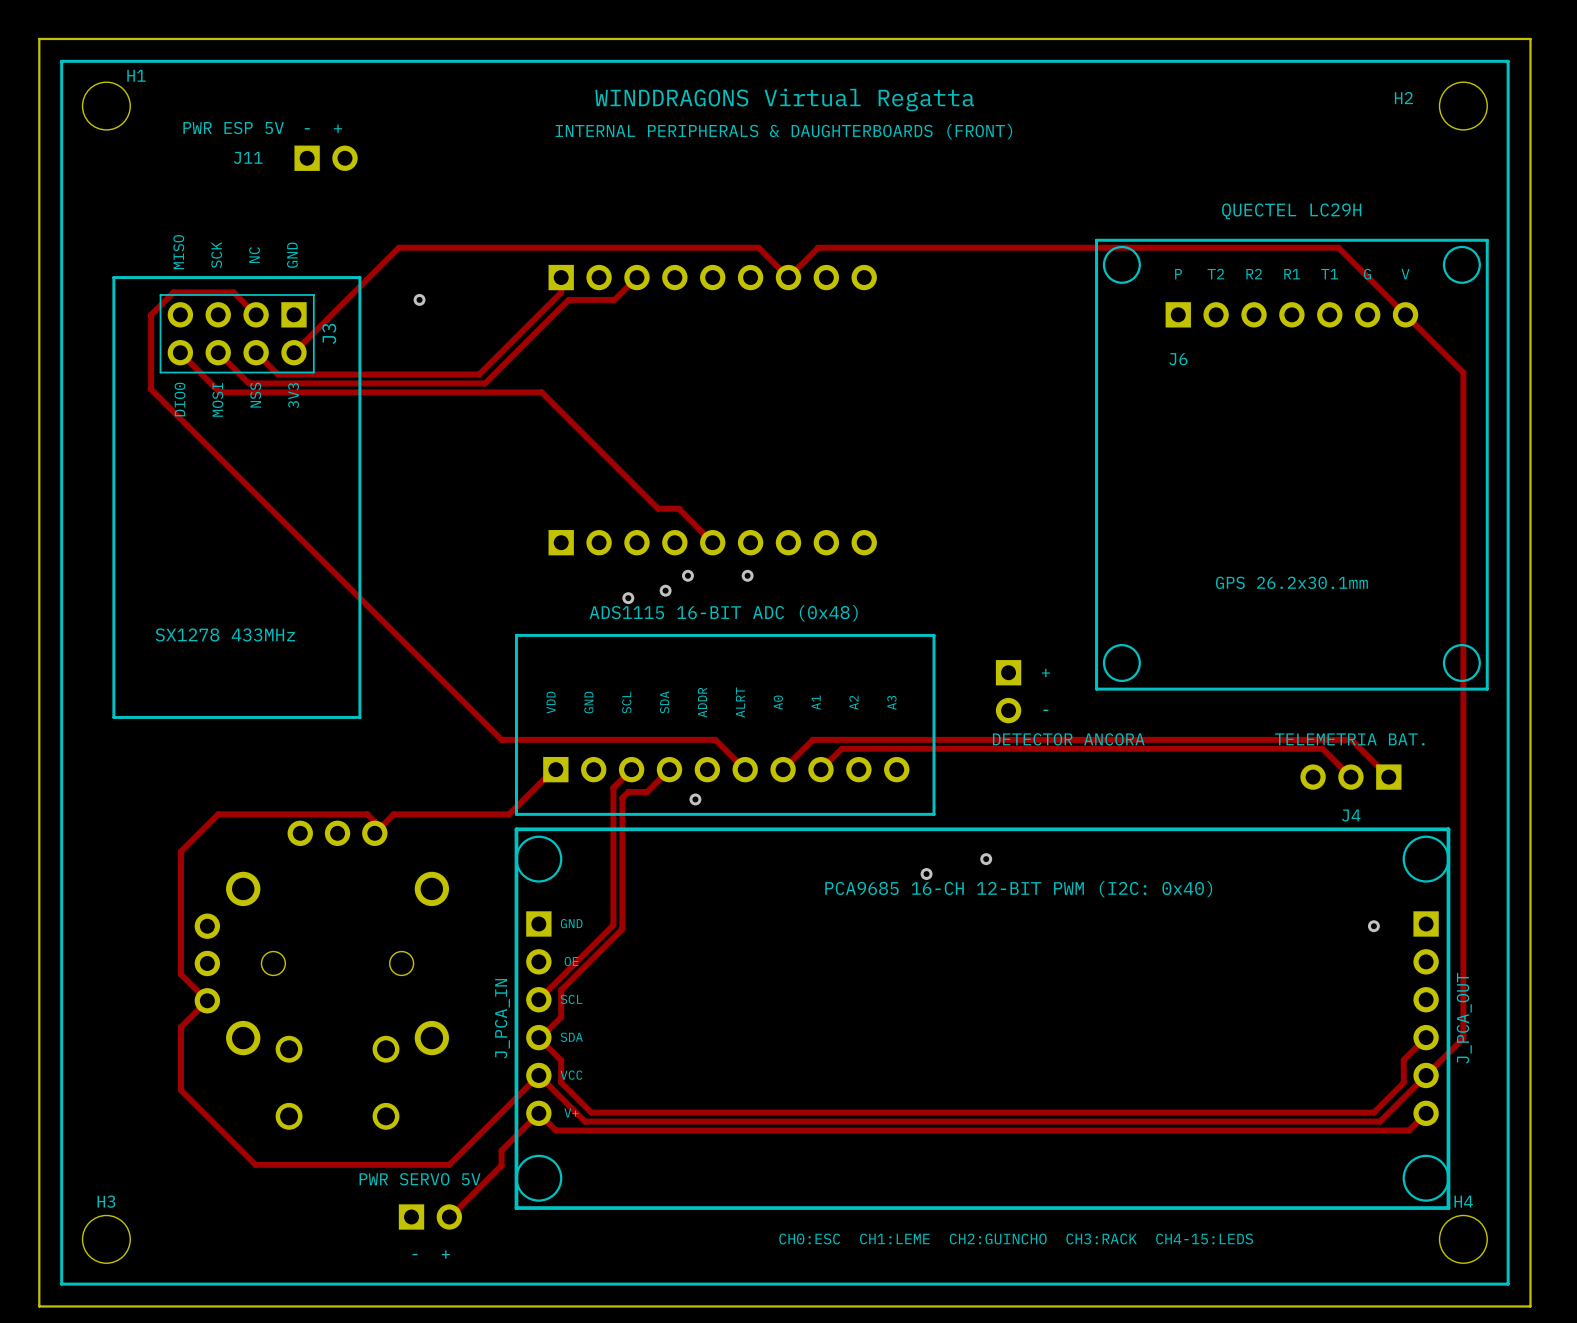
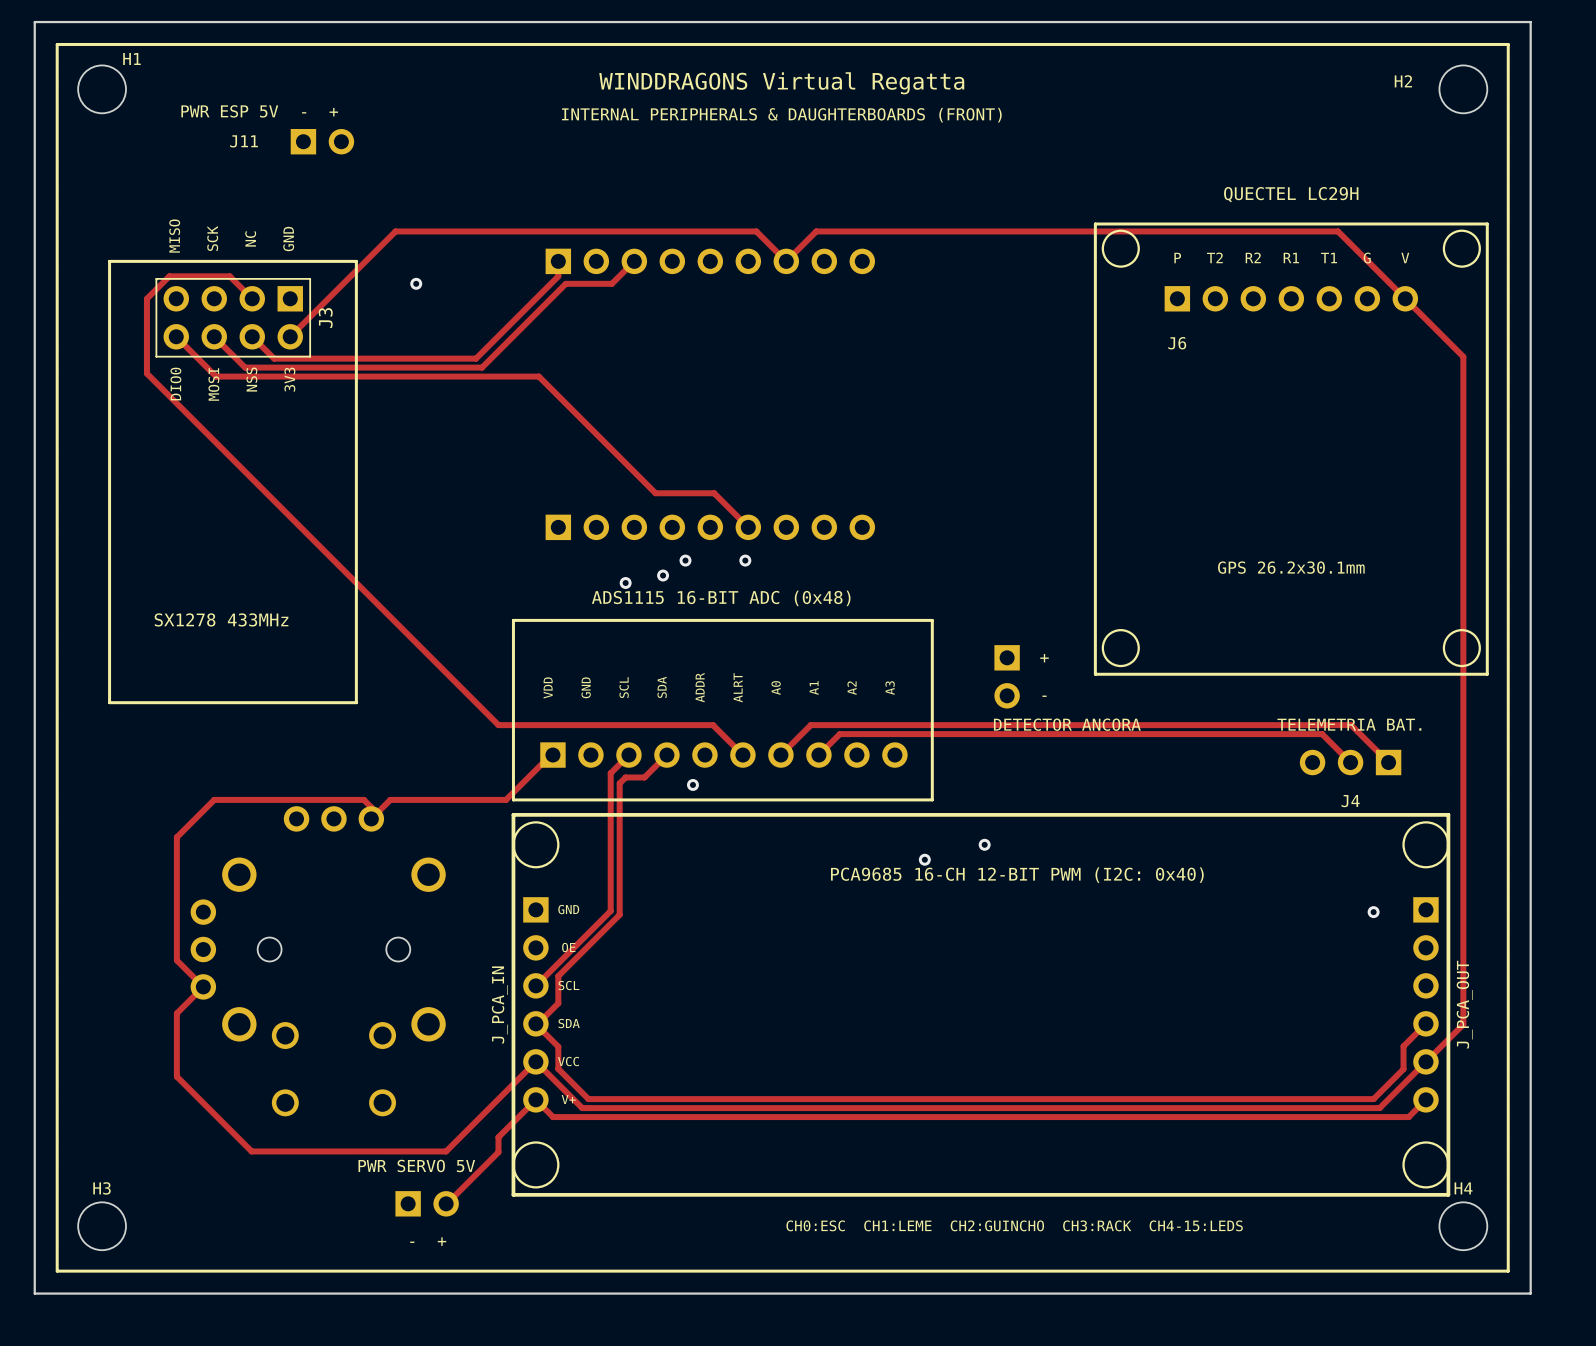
track: (678, 508) (712, 542) -> (676, 493) (714, 493) (748, 527)

